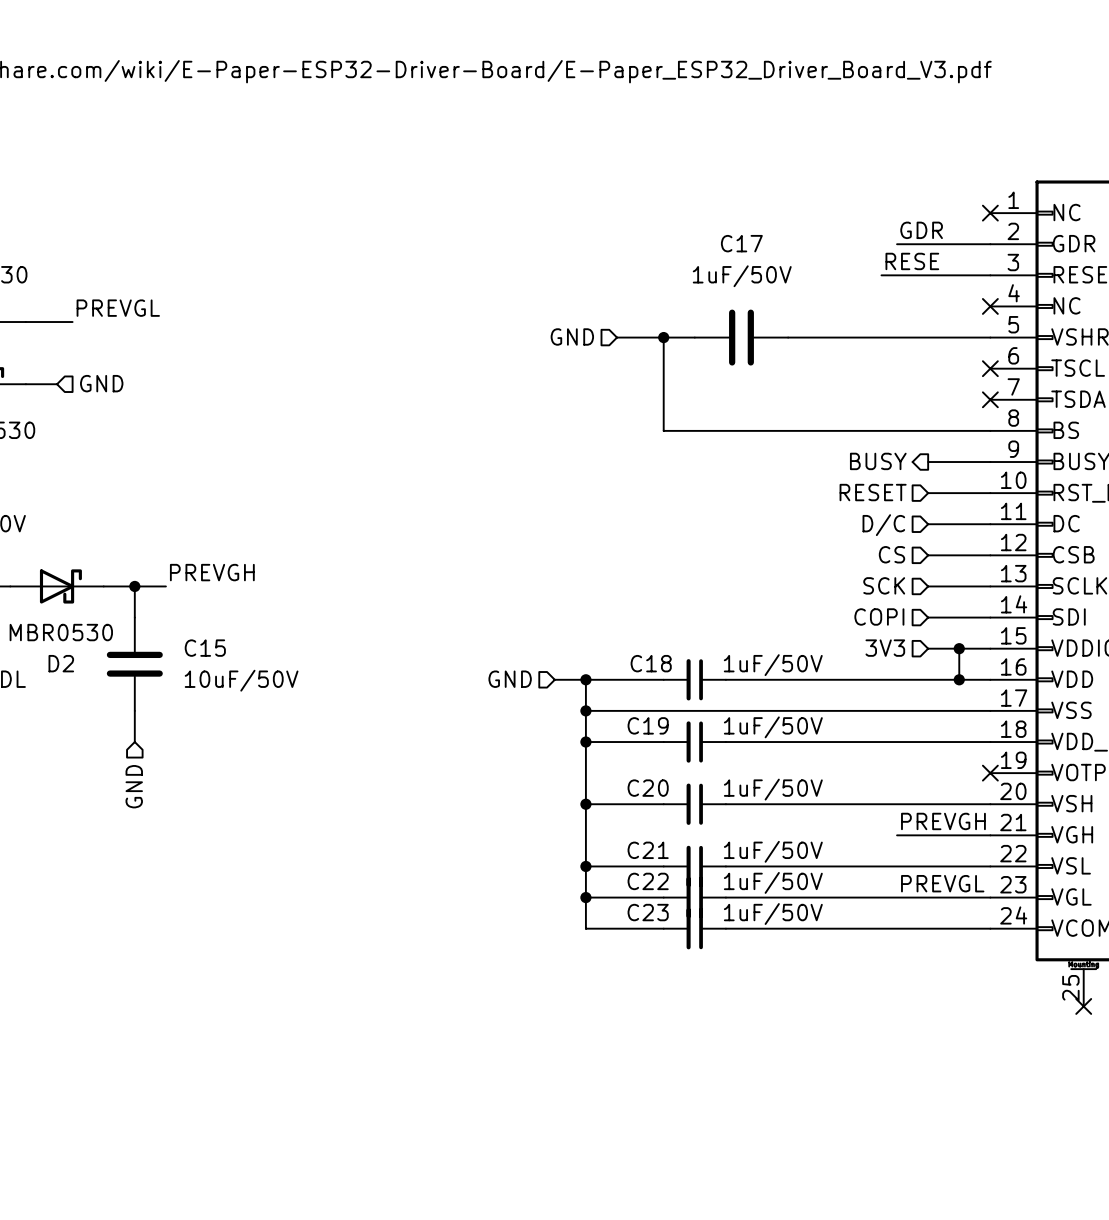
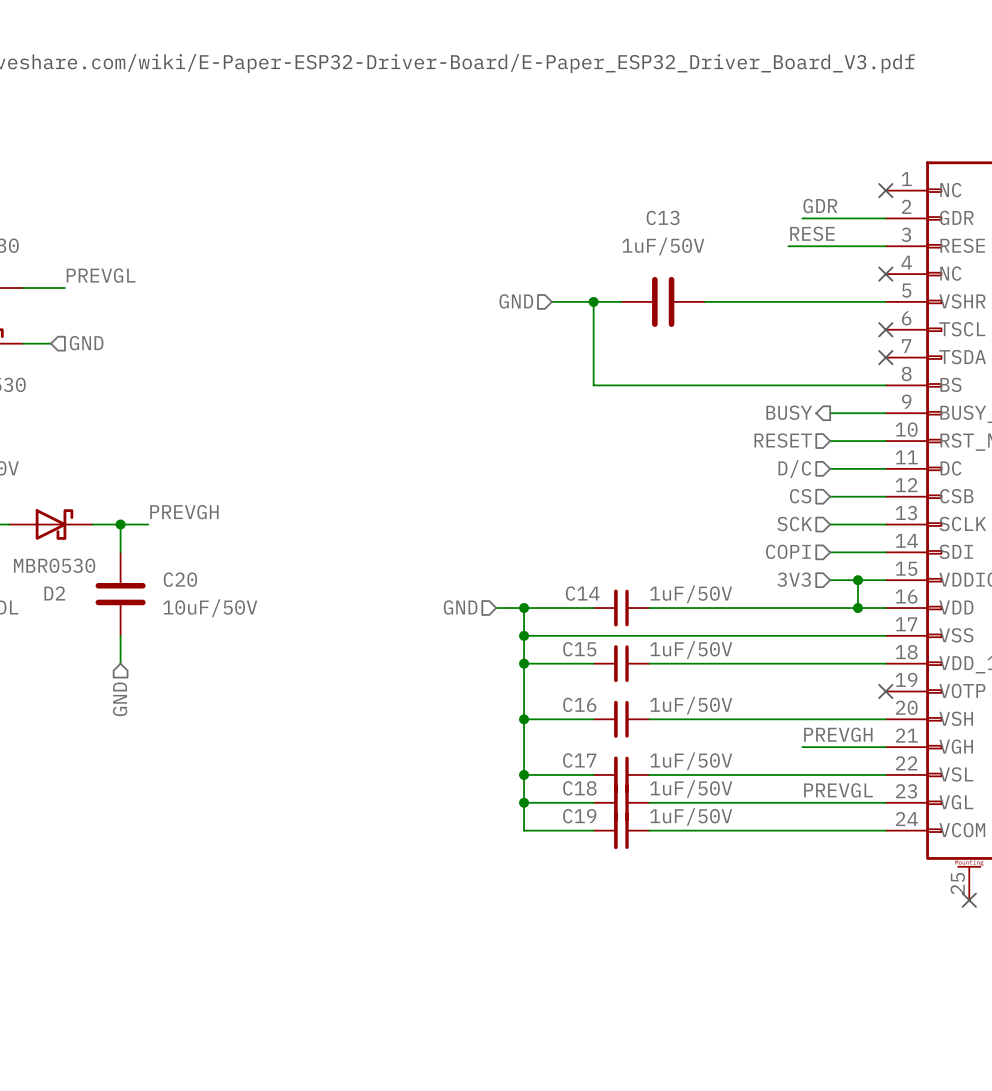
C17 name: C17 (741, 243) -> C13 (663, 217)
C15 name: C15 (205, 648) -> C20 (180, 579)
C18 name: C18 (651, 663) -> C14 (582, 593)
C19 name: C19 (648, 725) -> C15 (579, 649)
C20 name: C20 (648, 788) -> C16 (579, 704)
C21 name: C21 (648, 850) -> C17 (579, 760)
C22 name: C22 (648, 881) -> C18 (579, 788)
C23 name: C23 (648, 912) -> C19 (579, 816)

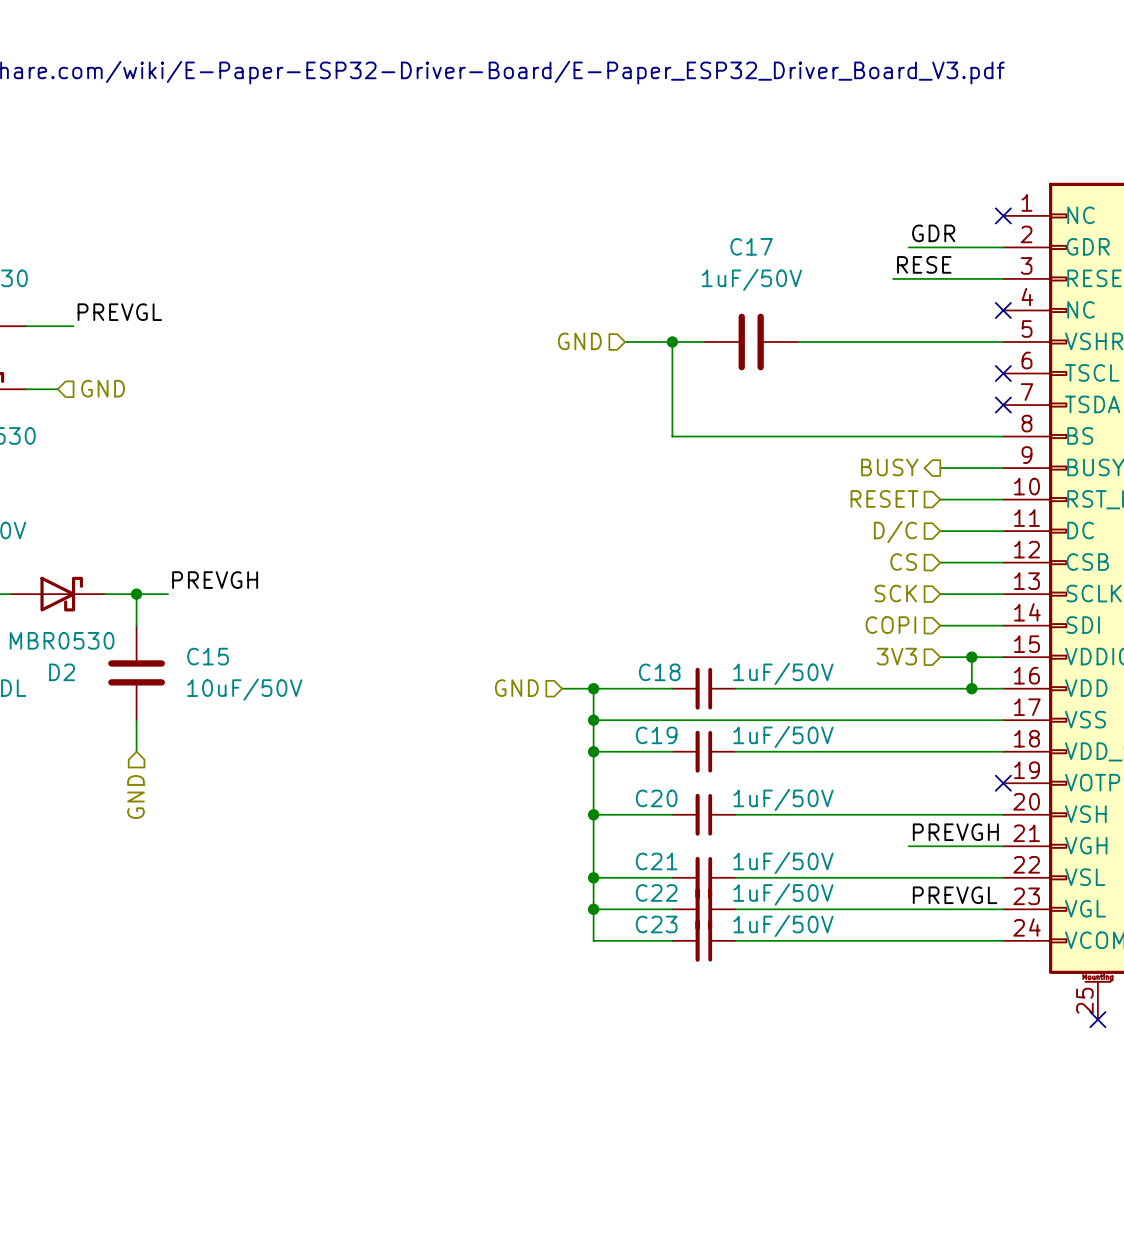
C13 name: C13 (663, 217) -> C17 (751, 246)
C20 name: C20 (180, 579) -> C15 (207, 656)
C14 name: C14 (582, 593) -> C18 (659, 672)
C15 name: C15 (579, 649) -> C19 (656, 735)
C16 name: C16 (579, 704) -> C20 (656, 798)
C17 name: C17 (579, 760) -> C21 (656, 861)
C18 name: C18 (579, 788) -> C22 (656, 892)
C19 name: C19 (579, 816) -> C23 (656, 924)

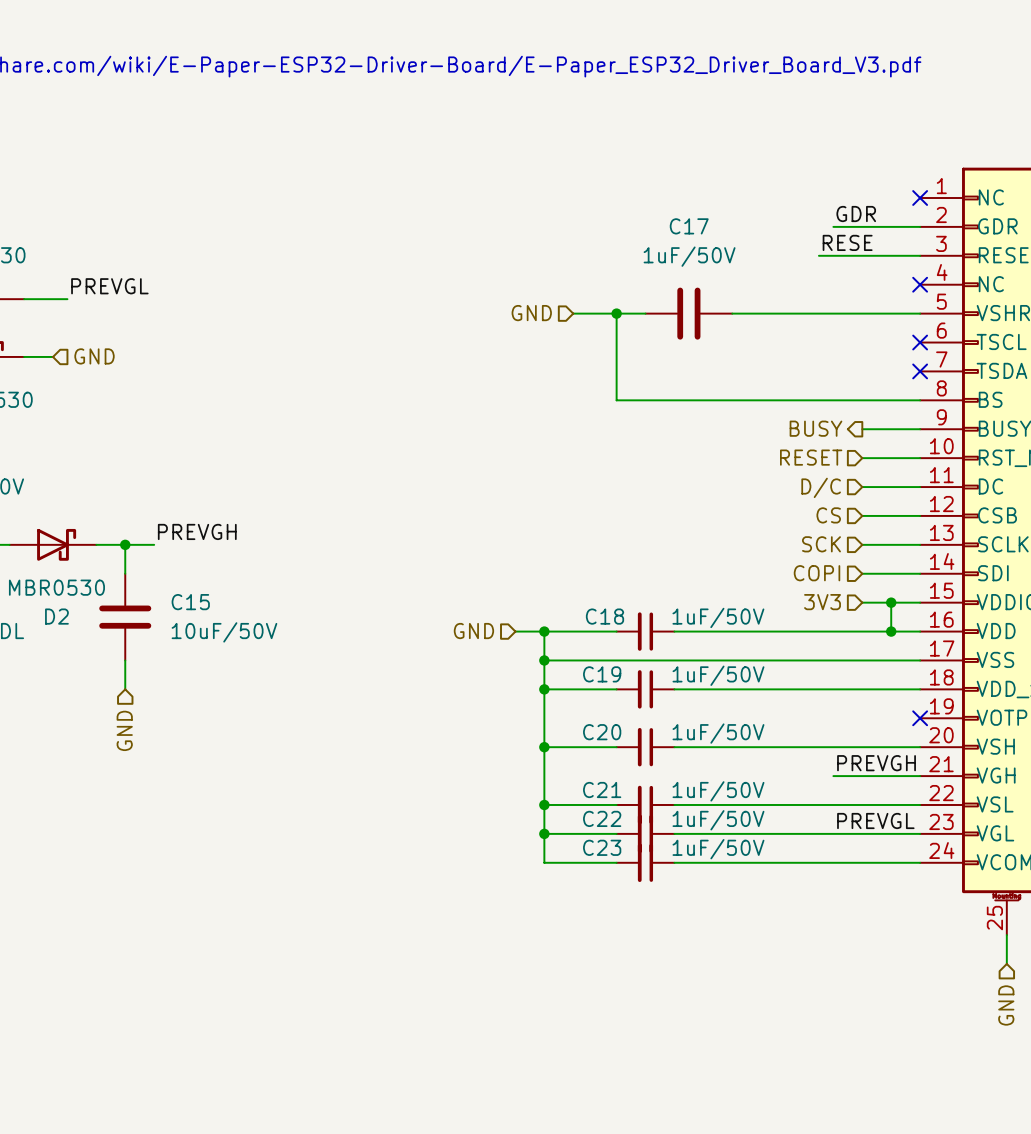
wire: none -> (1006, 935) (1006, 963)
no-connect mark: (1097, 1019) -> none
hierarchical label: none -> GND (1006, 1005)

